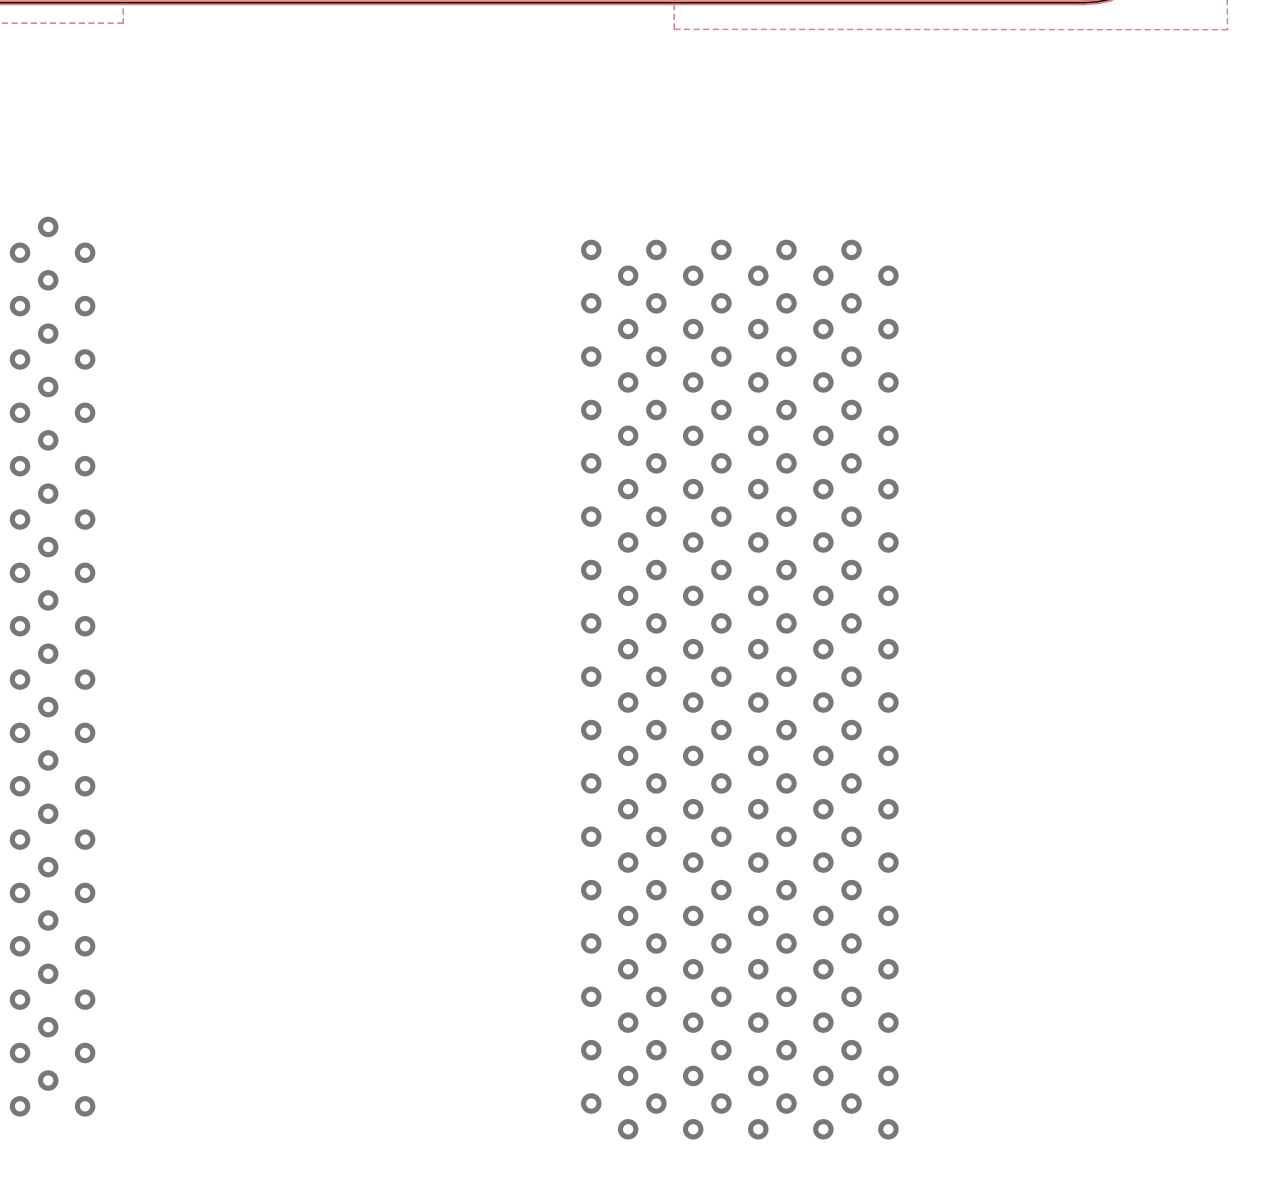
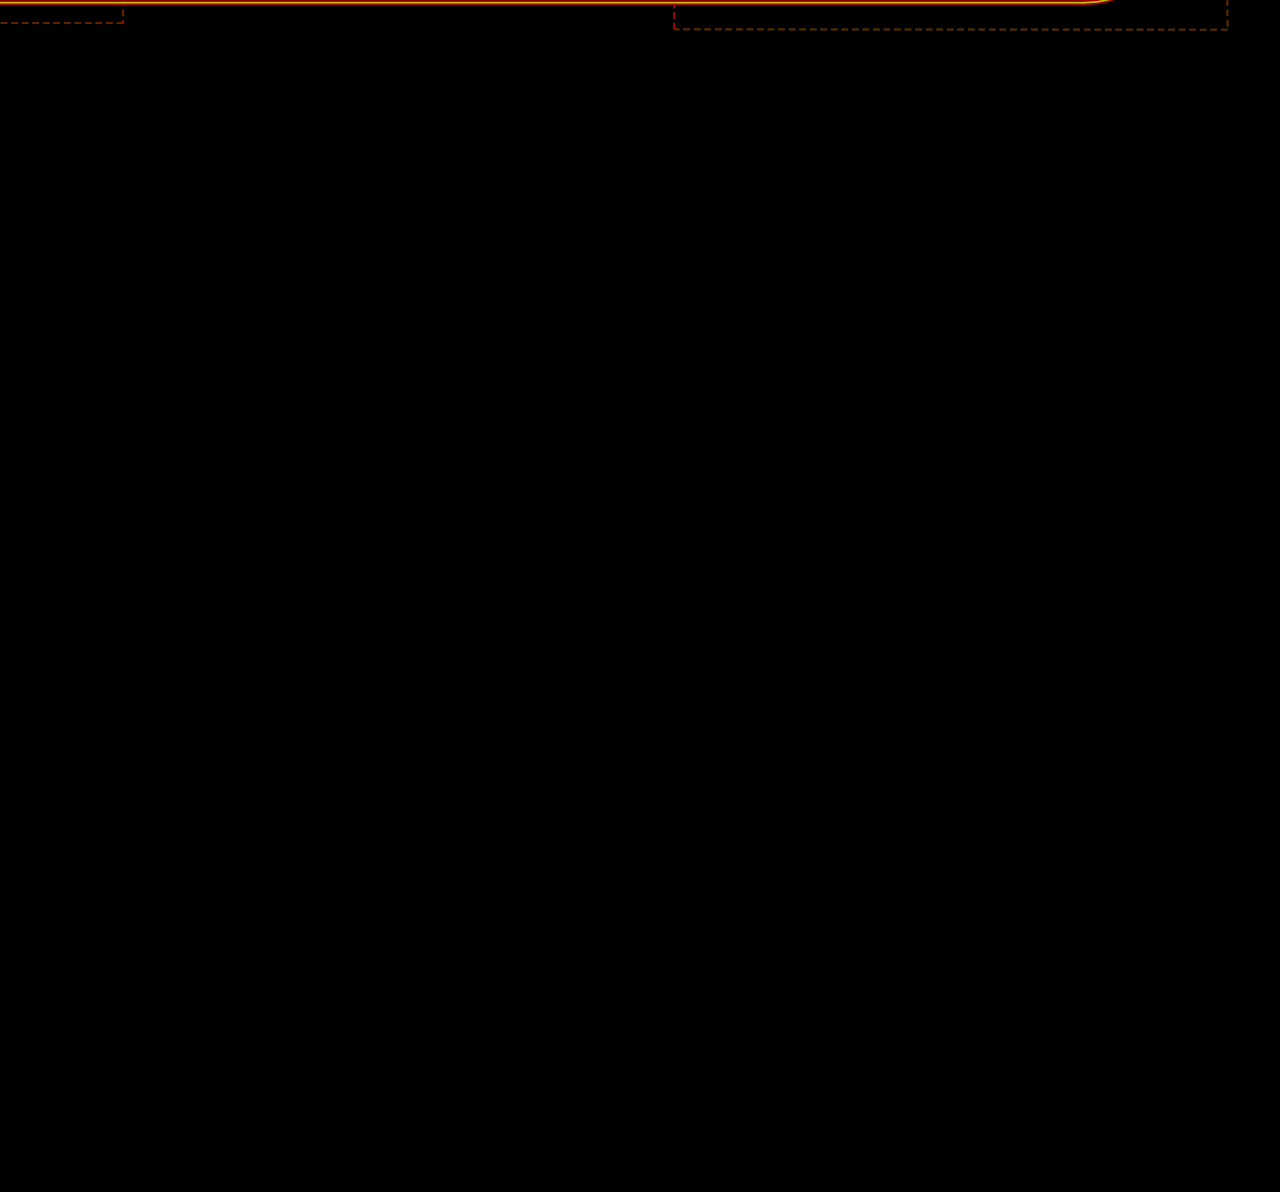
via: (48, 226) -> none
via: (591, 249) -> none
via: (656, 249) -> none
via: (721, 249) -> none
via: (786, 249) -> none
via: (851, 249) -> none
via: (20, 252) -> none
via: (85, 252) -> none
via: (628, 275) -> none
via: (693, 275) -> none
via: (758, 275) -> none
via: (823, 275) -> none
via: (888, 275) -> none
via: (48, 280) -> none
via: (591, 303) -> none
via: (656, 303) -> none
via: (721, 303) -> none
via: (786, 303) -> none
via: (851, 303) -> none
via: (20, 306) -> none
via: (85, 306) -> none
via: (628, 329) -> none
via: (693, 329) -> none
via: (758, 329) -> none
via: (823, 329) -> none
via: (888, 329) -> none
via: (48, 333) -> none
via: (591, 356) -> none
via: (656, 356) -> none
via: (721, 356) -> none
via: (786, 356) -> none
via: (851, 356) -> none
via: (20, 359) -> none
via: (85, 359) -> none
via: (628, 382) -> none
via: (693, 382) -> none
via: (758, 382) -> none
via: (823, 382) -> none
via: (888, 382) -> none
via: (48, 387) -> none
via: (591, 409) -> none
via: (656, 409) -> none
via: (721, 409) -> none
via: (786, 409) -> none
via: (851, 409) -> none
via: (20, 412) -> none
via: (85, 412) -> none
via: (628, 435) -> none
via: (693, 435) -> none
via: (758, 435) -> none
via: (823, 435) -> none
via: (888, 435) -> none
via: (48, 440) -> none
via: (591, 463) -> none
via: (656, 463) -> none
via: (721, 463) -> none
via: (786, 463) -> none
via: (851, 463) -> none
via: (20, 466) -> none
via: (85, 466) -> none
via: (628, 489) -> none
via: (693, 489) -> none
via: (758, 489) -> none
via: (823, 489) -> none
via: (888, 489) -> none
via: (48, 493) -> none
via: (591, 516) -> none
via: (656, 516) -> none
via: (721, 516) -> none
via: (786, 516) -> none
via: (851, 516) -> none
via: (20, 519) -> none
via: (85, 519) -> none
via: (628, 542) -> none
via: (693, 542) -> none
via: (758, 542) -> none
via: (823, 542) -> none
via: (888, 542) -> none
via: (48, 547) -> none
via: (591, 570) -> none
via: (656, 570) -> none
via: (721, 570) -> none
via: (786, 570) -> none
via: (851, 570) -> none
via: (20, 572) -> none
via: (85, 572) -> none
via: (628, 595) -> none
via: (693, 595) -> none
via: (758, 595) -> none
via: (823, 595) -> none
via: (888, 595) -> none
via: (48, 600) -> none
via: (591, 623) -> none
via: (656, 623) -> none
via: (721, 623) -> none
via: (786, 623) -> none
via: (851, 623) -> none
via: (20, 626) -> none
via: (85, 626) -> none
via: (628, 649) -> none
via: (693, 649) -> none
via: (758, 649) -> none
via: (823, 649) -> none
via: (888, 649) -> none
via: (48, 653) -> none
via: (591, 676) -> none
via: (656, 676) -> none
via: (721, 676) -> none
via: (786, 676) -> none
via: (851, 676) -> none
via: (20, 679) -> none
via: (85, 679) -> none
via: (628, 702) -> none
via: (693, 702) -> none
via: (758, 702) -> none
via: (823, 702) -> none
via: (888, 702) -> none
via: (48, 707) -> none
via: (591, 730) -> none
via: (656, 730) -> none
via: (721, 730) -> none
via: (786, 730) -> none
via: (851, 730) -> none
via: (20, 732) -> none
via: (85, 732) -> none
via: (628, 755) -> none
via: (693, 755) -> none
via: (758, 755) -> none
via: (823, 755) -> none
via: (888, 755) -> none
via: (48, 760) -> none
via: (591, 783) -> none
via: (656, 783) -> none
via: (721, 783) -> none
via: (786, 783) -> none
via: (851, 783) -> none
via: (20, 786) -> none
via: (85, 786) -> none
via: (628, 809) -> none
via: (693, 809) -> none
via: (758, 809) -> none
via: (823, 809) -> none
via: (888, 809) -> none
via: (48, 813) -> none
via: (591, 836) -> none
via: (656, 836) -> none
via: (721, 836) -> none
via: (786, 836) -> none
via: (851, 836) -> none
via: (20, 839) -> none
via: (85, 839) -> none
via: (628, 862) -> none
via: (693, 862) -> none
via: (758, 862) -> none
via: (823, 862) -> none
via: (888, 862) -> none
via: (48, 867) -> none
via: (591, 890) -> none
via: (656, 890) -> none
via: (721, 890) -> none
via: (786, 890) -> none
via: (851, 890) -> none
via: (20, 892) -> none
via: (85, 892) -> none
via: (628, 915) -> none
via: (693, 915) -> none
via: (758, 915) -> none
via: (823, 915) -> none
via: (888, 915) -> none
via: (48, 920) -> none
via: (591, 943) -> none
via: (656, 943) -> none
via: (721, 943) -> none
via: (786, 943) -> none
via: (851, 943) -> none
via: (20, 946) -> none
via: (85, 946) -> none
via: (628, 969) -> none
via: (693, 969) -> none
via: (758, 969) -> none
via: (823, 969) -> none
via: (888, 969) -> none
via: (48, 973) -> none
via: (591, 996) -> none
via: (656, 996) -> none
via: (721, 996) -> none
via: (786, 996) -> none
via: (851, 996) -> none
via: (20, 999) -> none
via: (85, 999) -> none
via: (628, 1022) -> none
via: (693, 1022) -> none
via: (758, 1022) -> none
via: (823, 1022) -> none
via: (888, 1022) -> none
via: (48, 1027) -> none
via: (591, 1050) -> none
via: (656, 1050) -> none
via: (721, 1050) -> none
via: (786, 1050) -> none
via: (851, 1050) -> none
via: (20, 1052) -> none
via: (85, 1052) -> none
via: (628, 1075) -> none
via: (693, 1075) -> none
via: (758, 1075) -> none
via: (823, 1075) -> none
via: (888, 1075) -> none
via: (48, 1080) -> none
via: (591, 1103) -> none
via: (656, 1103) -> none
via: (721, 1103) -> none
via: (786, 1103) -> none
via: (851, 1103) -> none
via: (20, 1106) -> none
via: (85, 1106) -> none
via: (628, 1129) -> none
via: (693, 1129) -> none
via: (758, 1129) -> none
via: (823, 1129) -> none
via: (888, 1129) -> none

